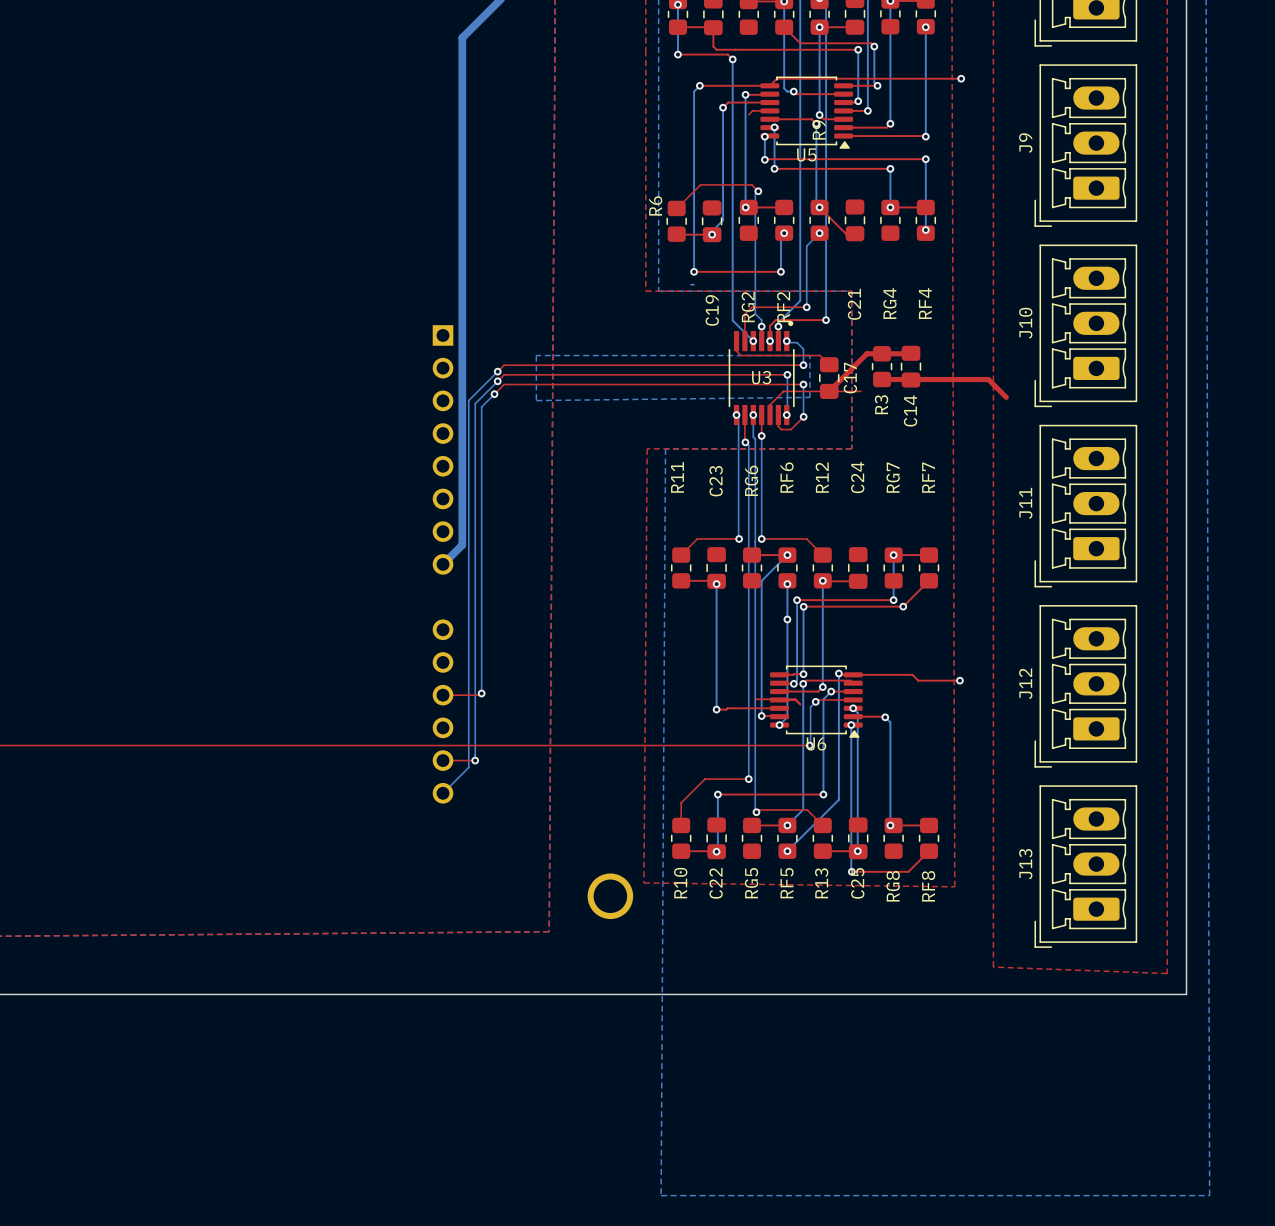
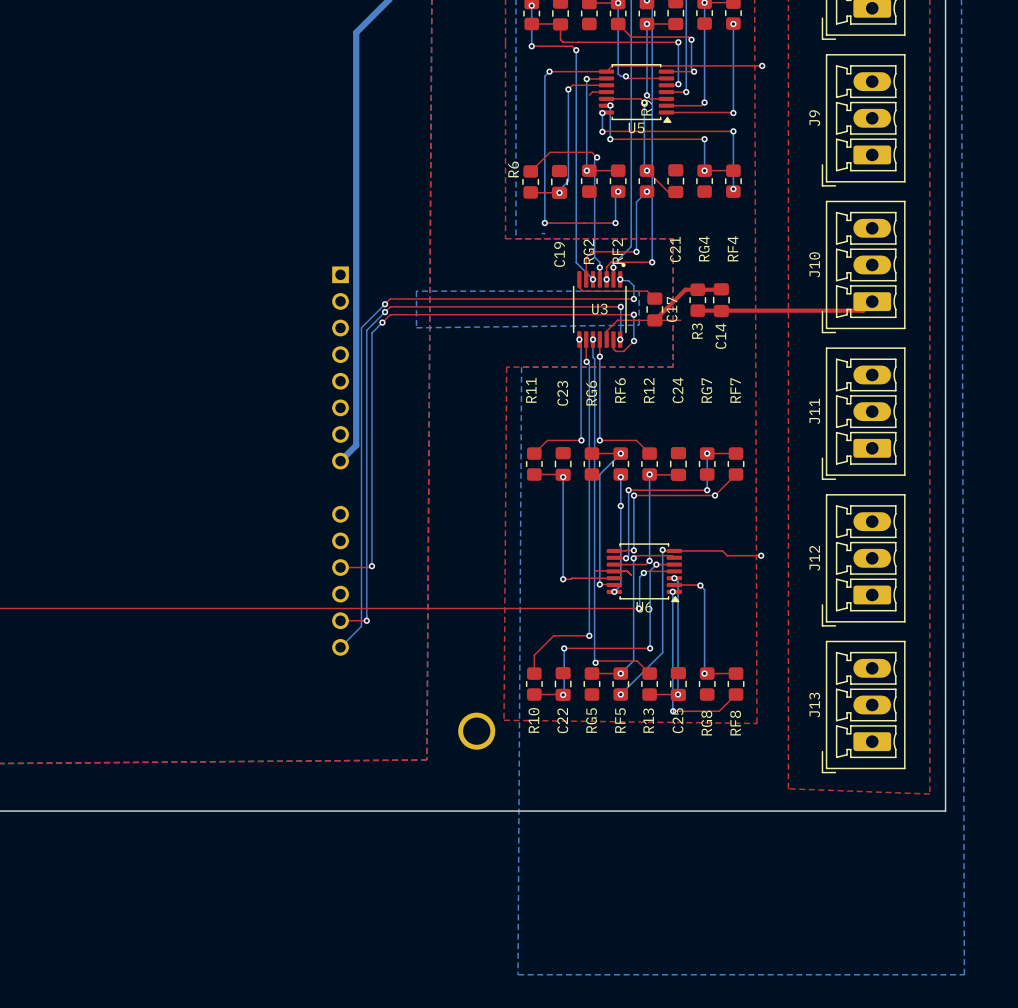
top track: (988, 379) (1006, 397) -> (784, 310) (863, 310) (872, 301)

